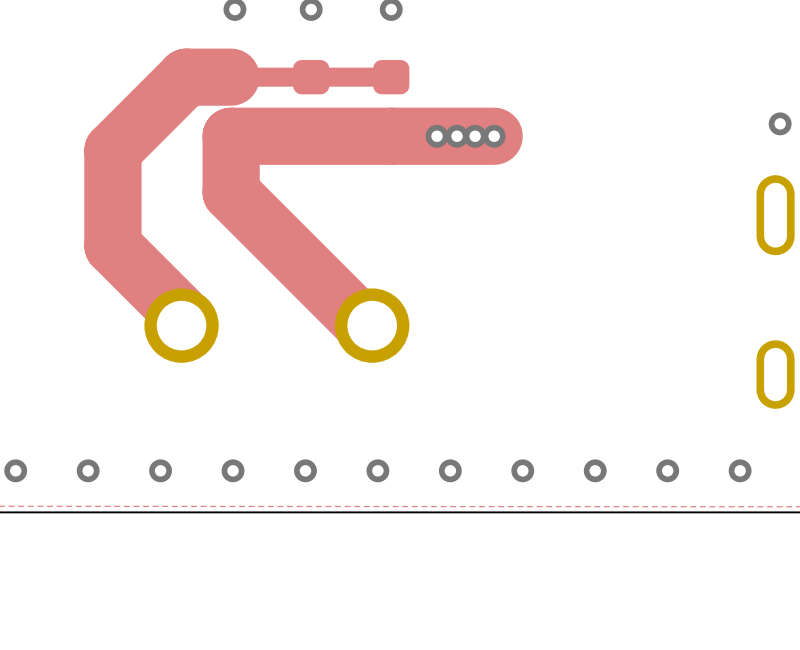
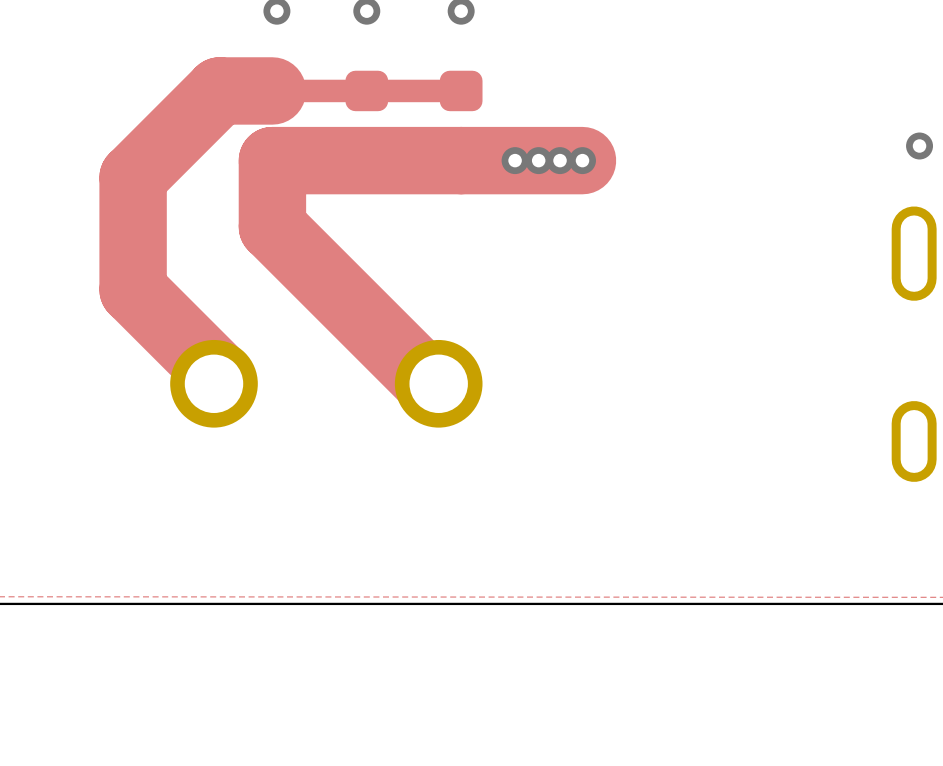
via: (15, 470) -> none
via: (88, 470) -> none
via: (160, 470) -> none
via: (233, 470) -> none
via: (305, 470) -> none
via: (377, 470) -> none
via: (450, 470) -> none
via: (522, 470) -> none
via: (595, 470) -> none
via: (667, 470) -> none
via: (740, 470) -> none

